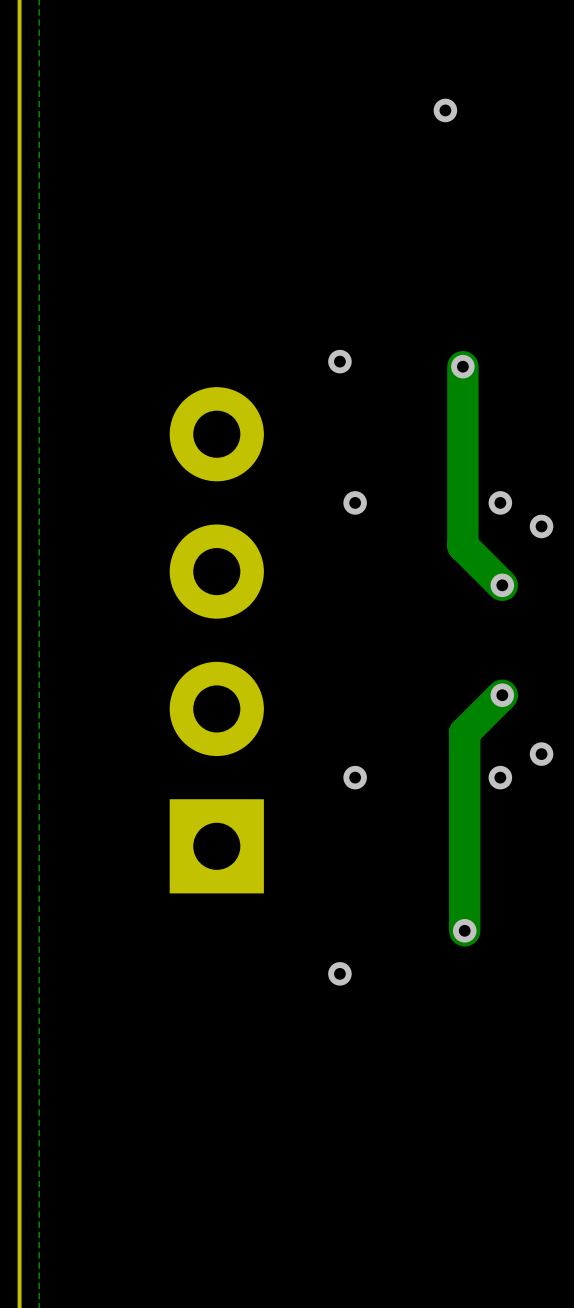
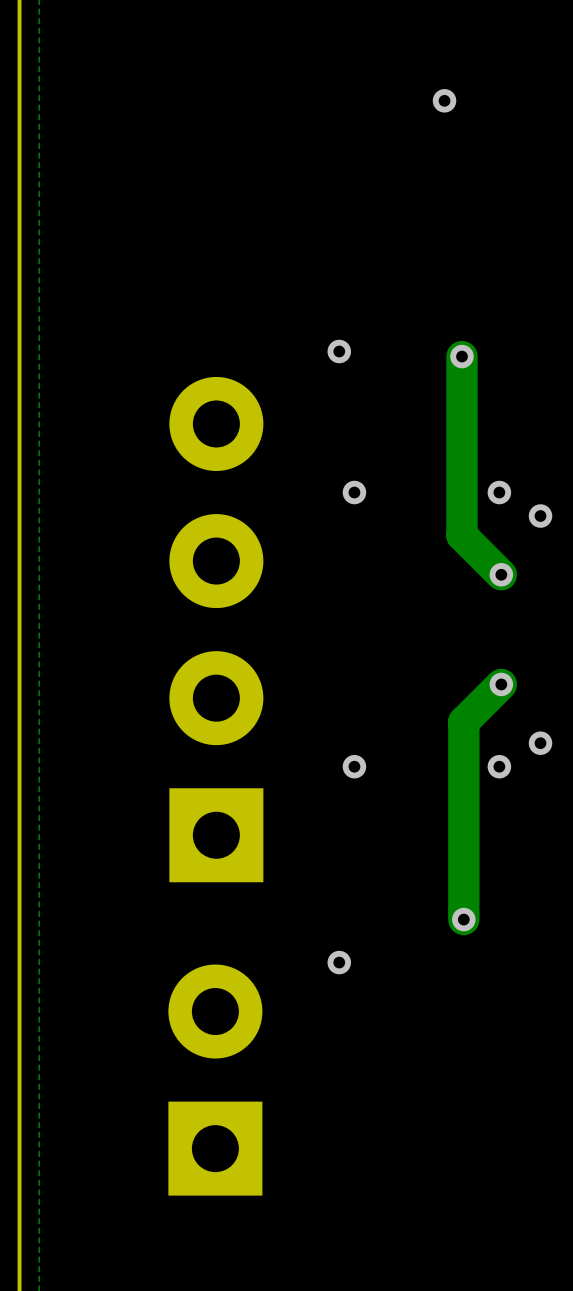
part: none -> (215, 1080)

